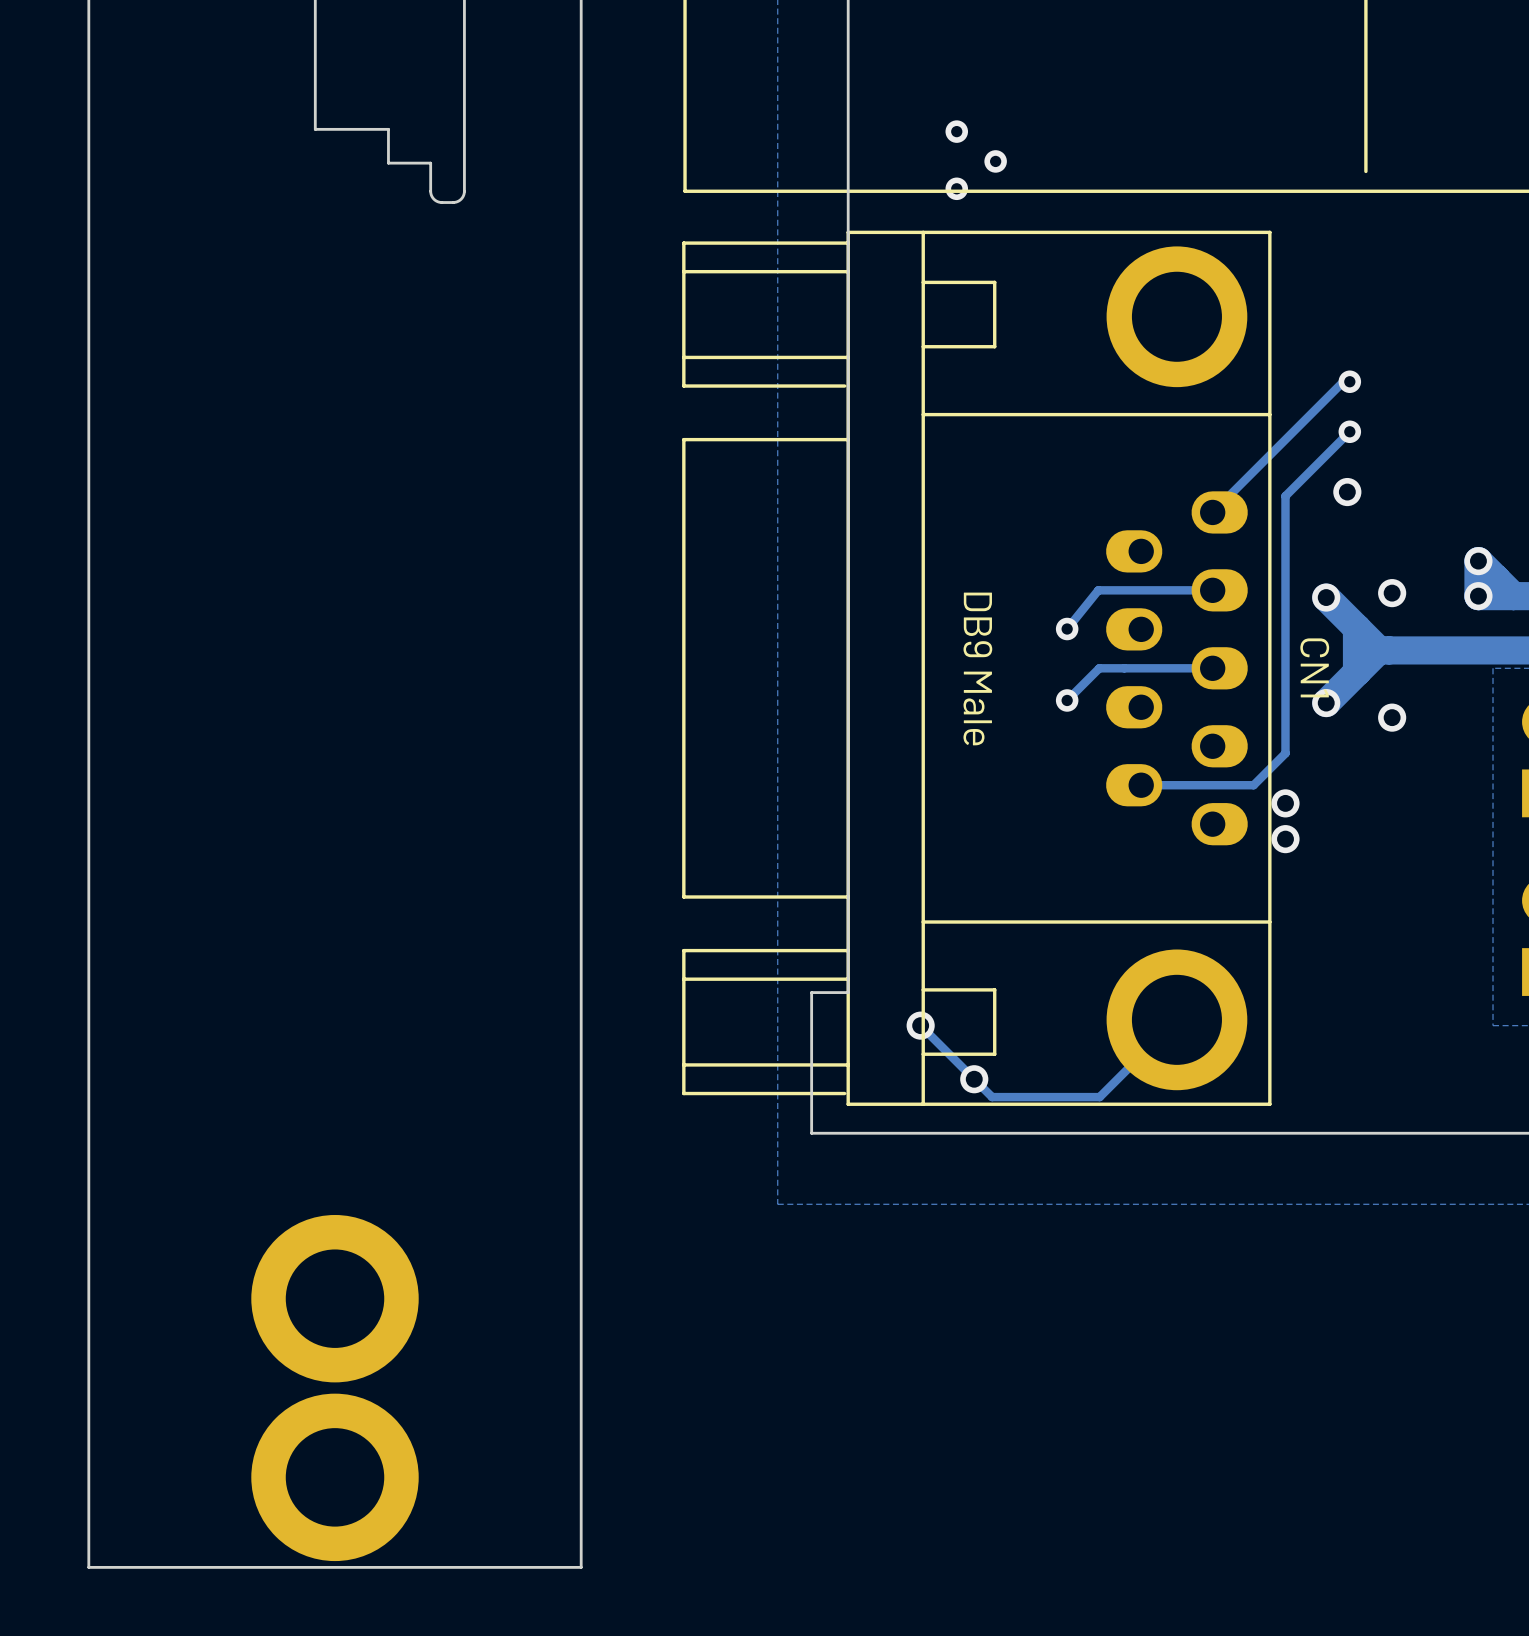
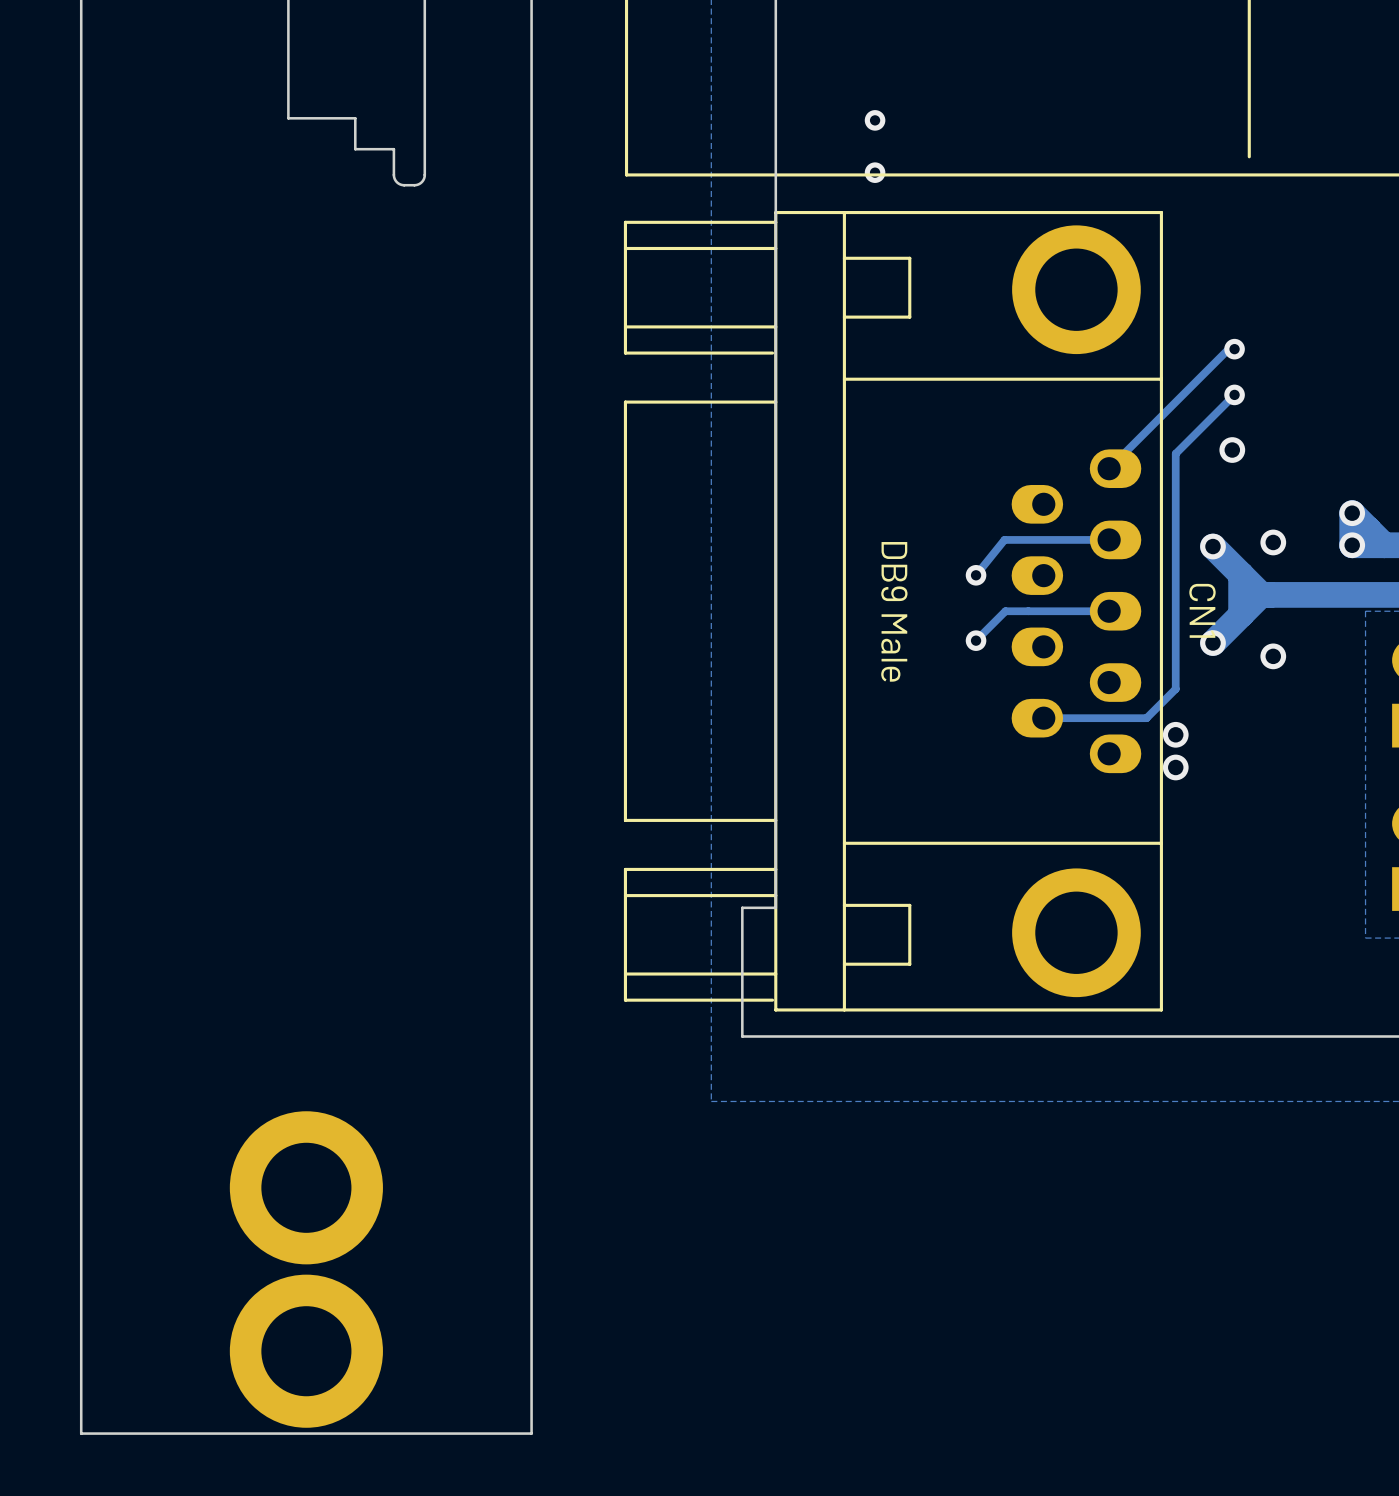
via: (995, 161) -> none
track: (1176, 1019) (1099, 1097) (992, 1097) (920, 1025) -> none
via: (920, 1025) -> none
via: (974, 1079) -> none

